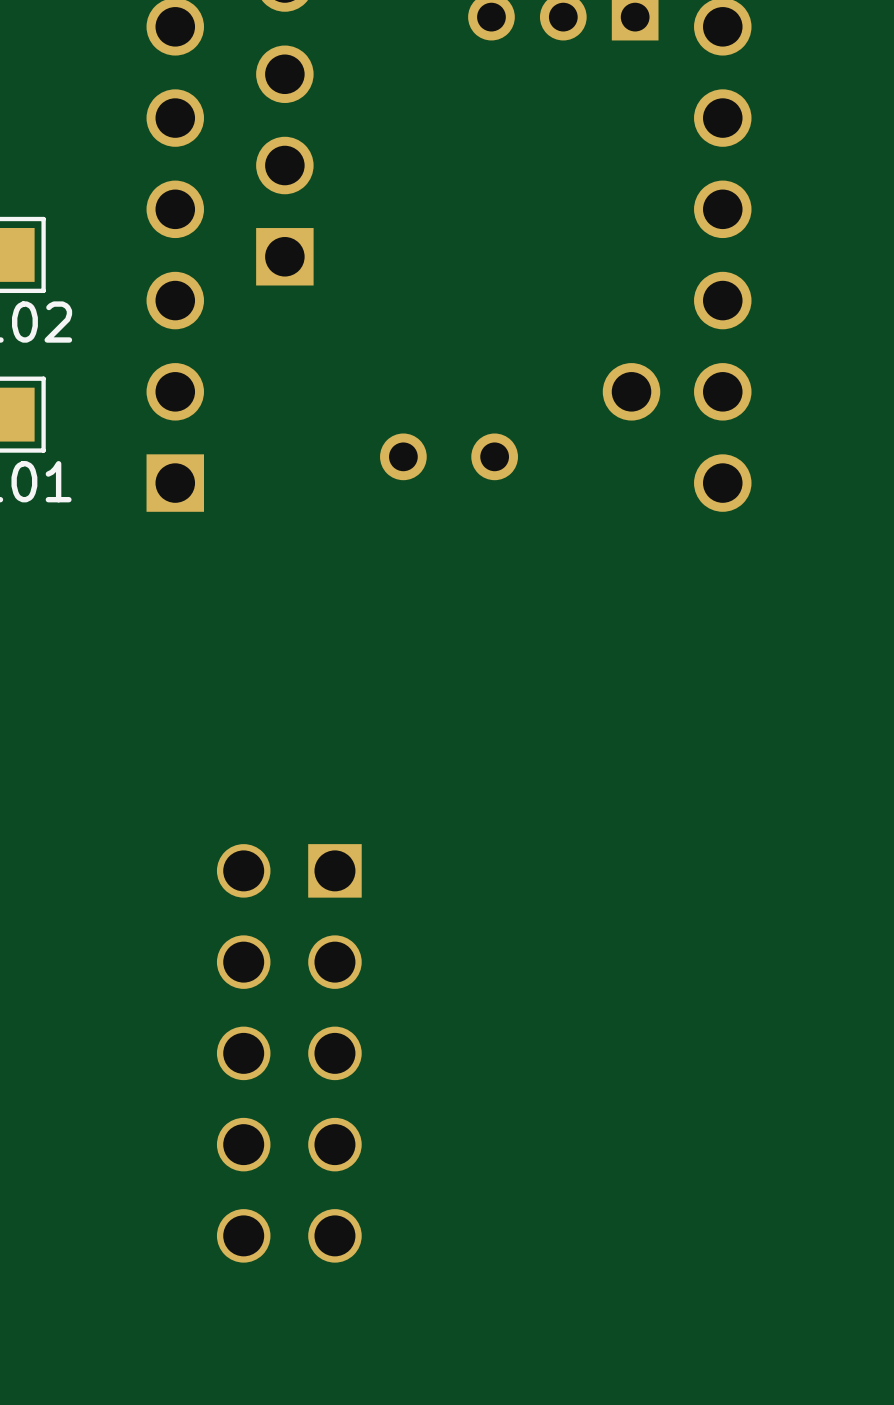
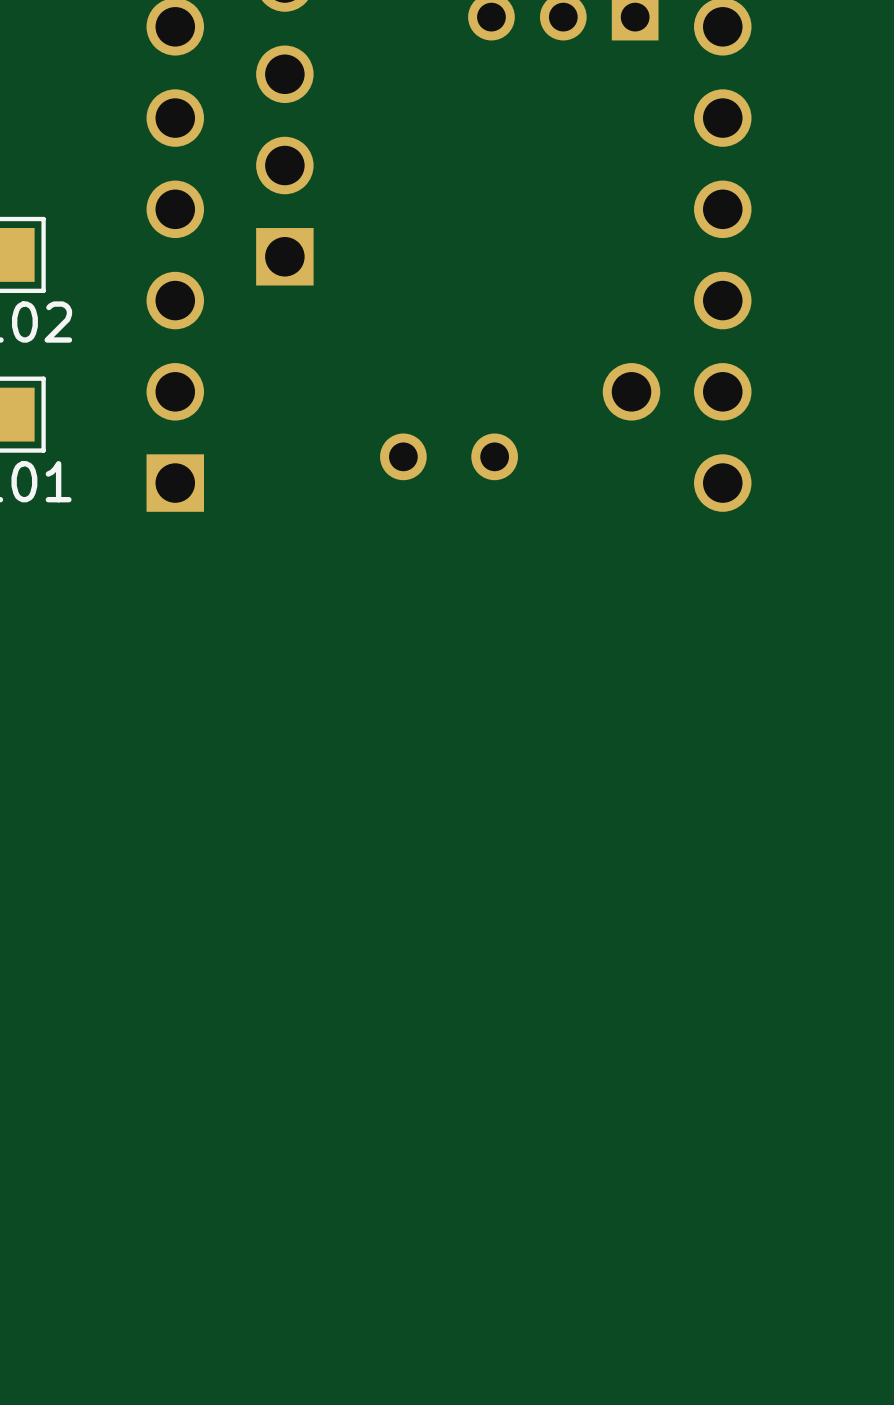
part: (289, 1053) -> none

